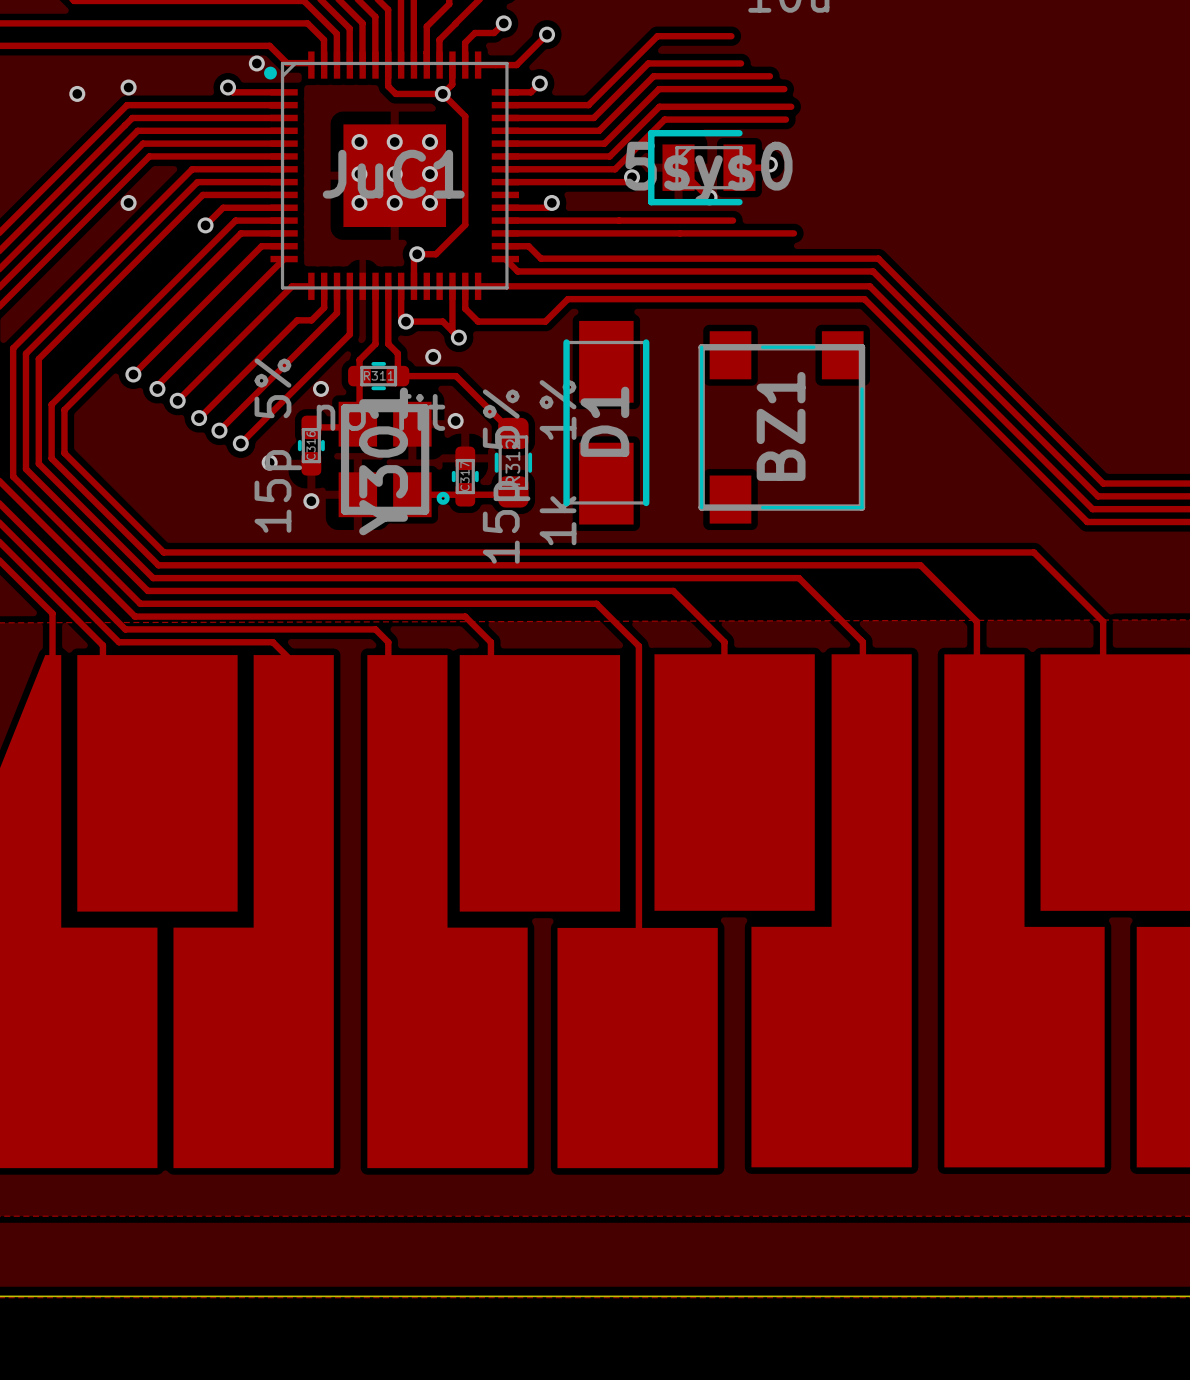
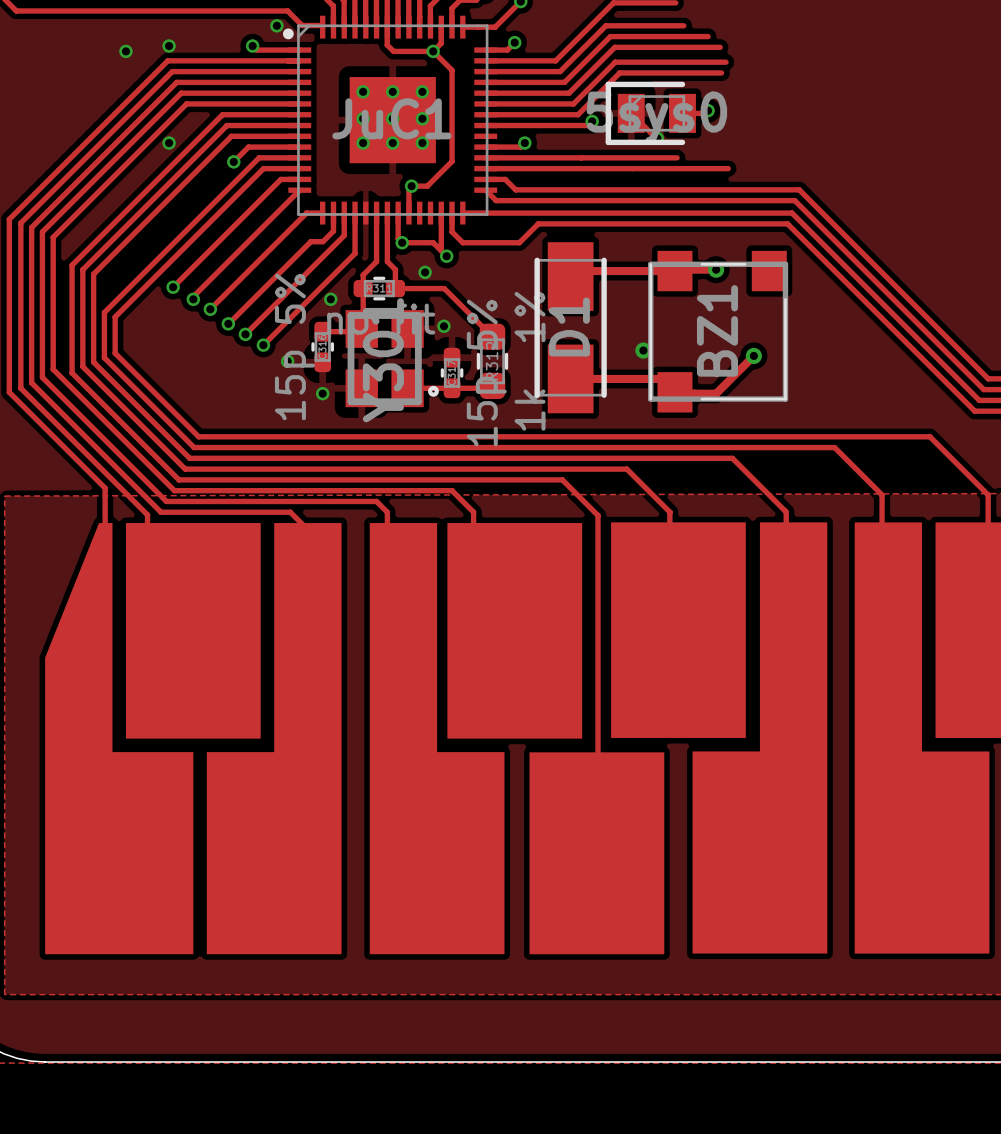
track: none -> (716, 269) (576, 271) (570, 276)
via: none -> (716, 269)
via: none -> (643, 350)
track: none -> (753, 355) (716, 393) (676, 393) (661, 378) (570, 378)
via: none -> (753, 355)

